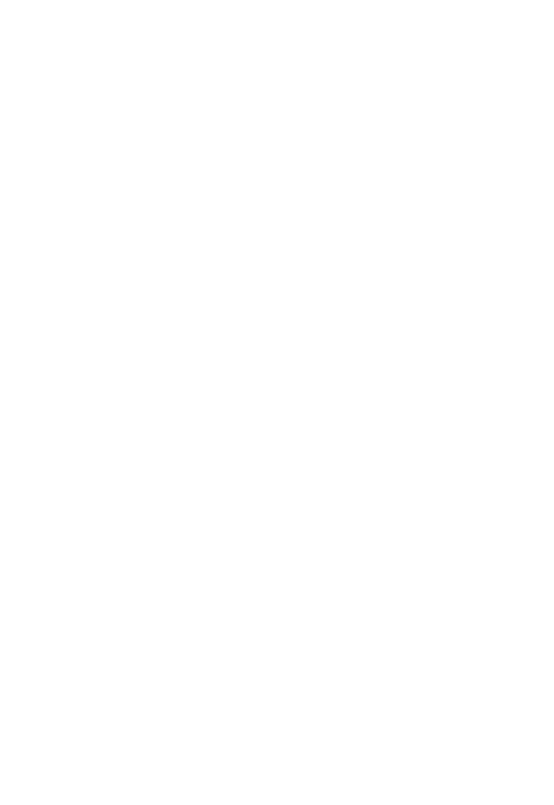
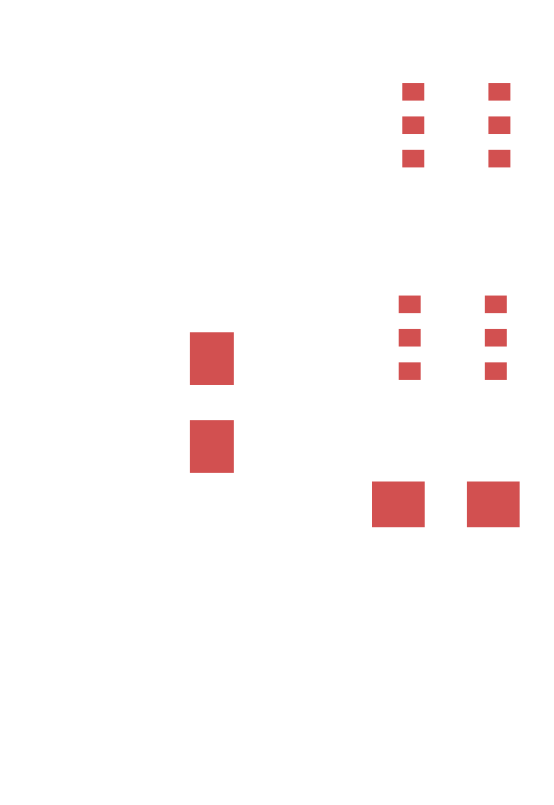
part: none -> (456, 125)
part: none -> (452, 337)
part: none -> (211, 402)
part: none -> (445, 504)

